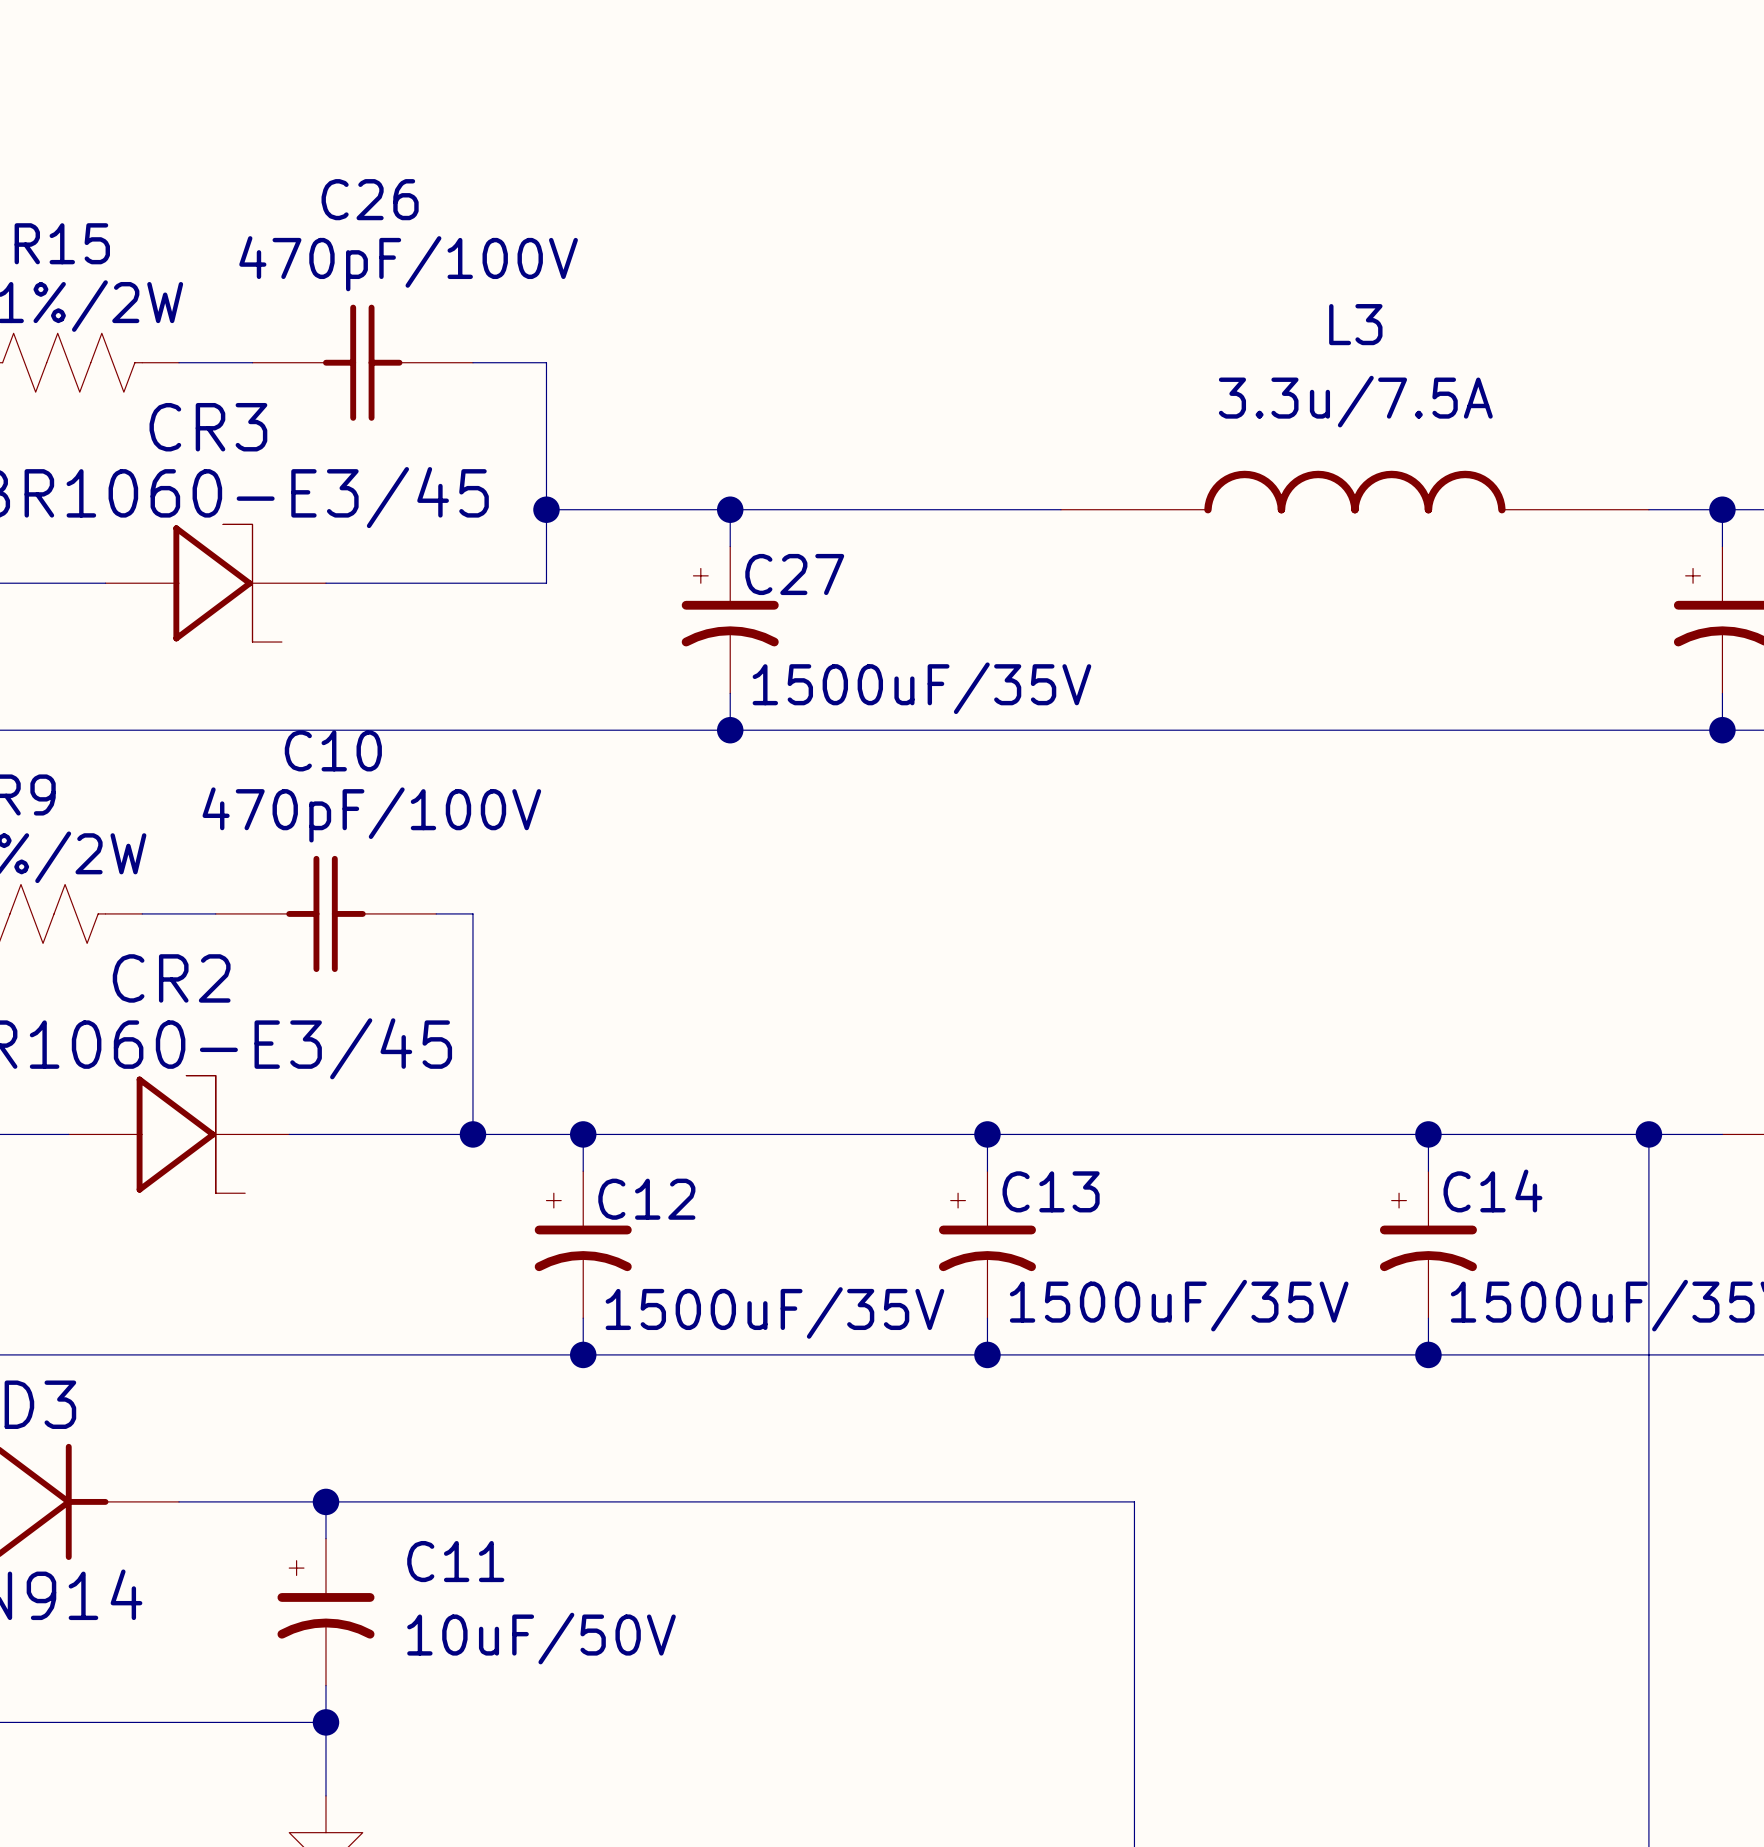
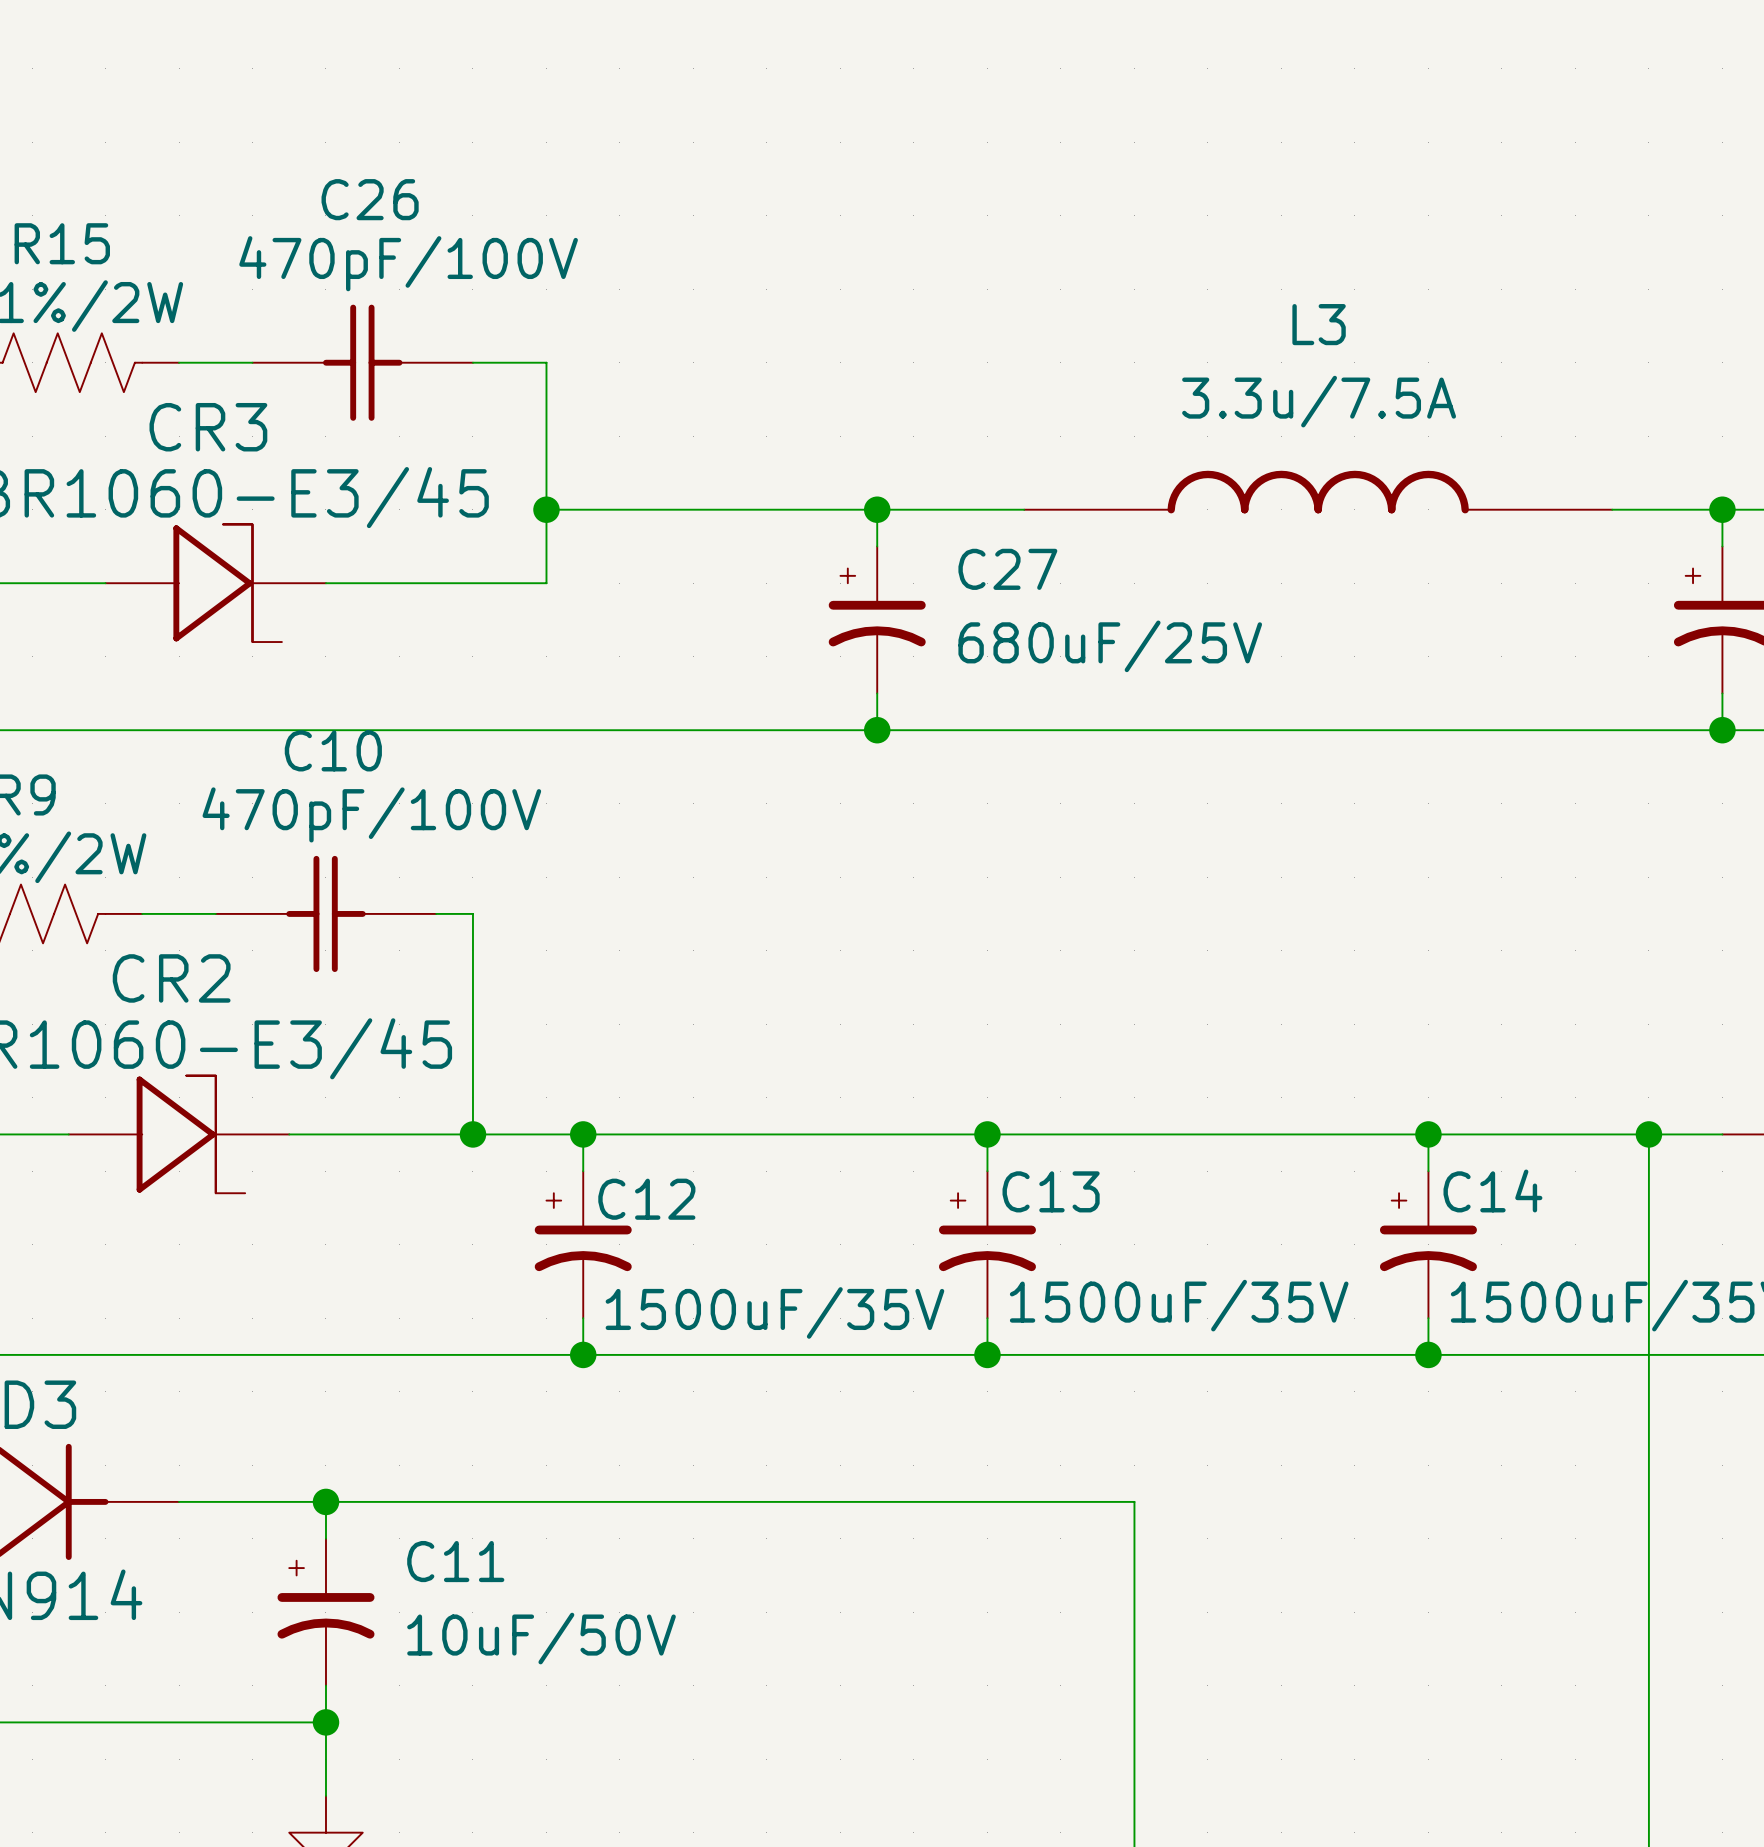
L3 position: (1354, 492) -> (1318, 492)
wire: (730, 509) (730, 546) -> (877, 509) (877, 546)
junction: (730, 509) -> none
junction: none -> (877, 509)
C27 name position: C27 (794, 574) -> C27 (1007, 569)
C27 position: (730, 619) -> (877, 619)
C27 value: 1500uF/35V (921, 688) -> 680uF/25V (1110, 646)
wire: (730, 693) (730, 730) -> (877, 693) (877, 730)
junction: (730, 730) -> none
junction: none -> (877, 730)

